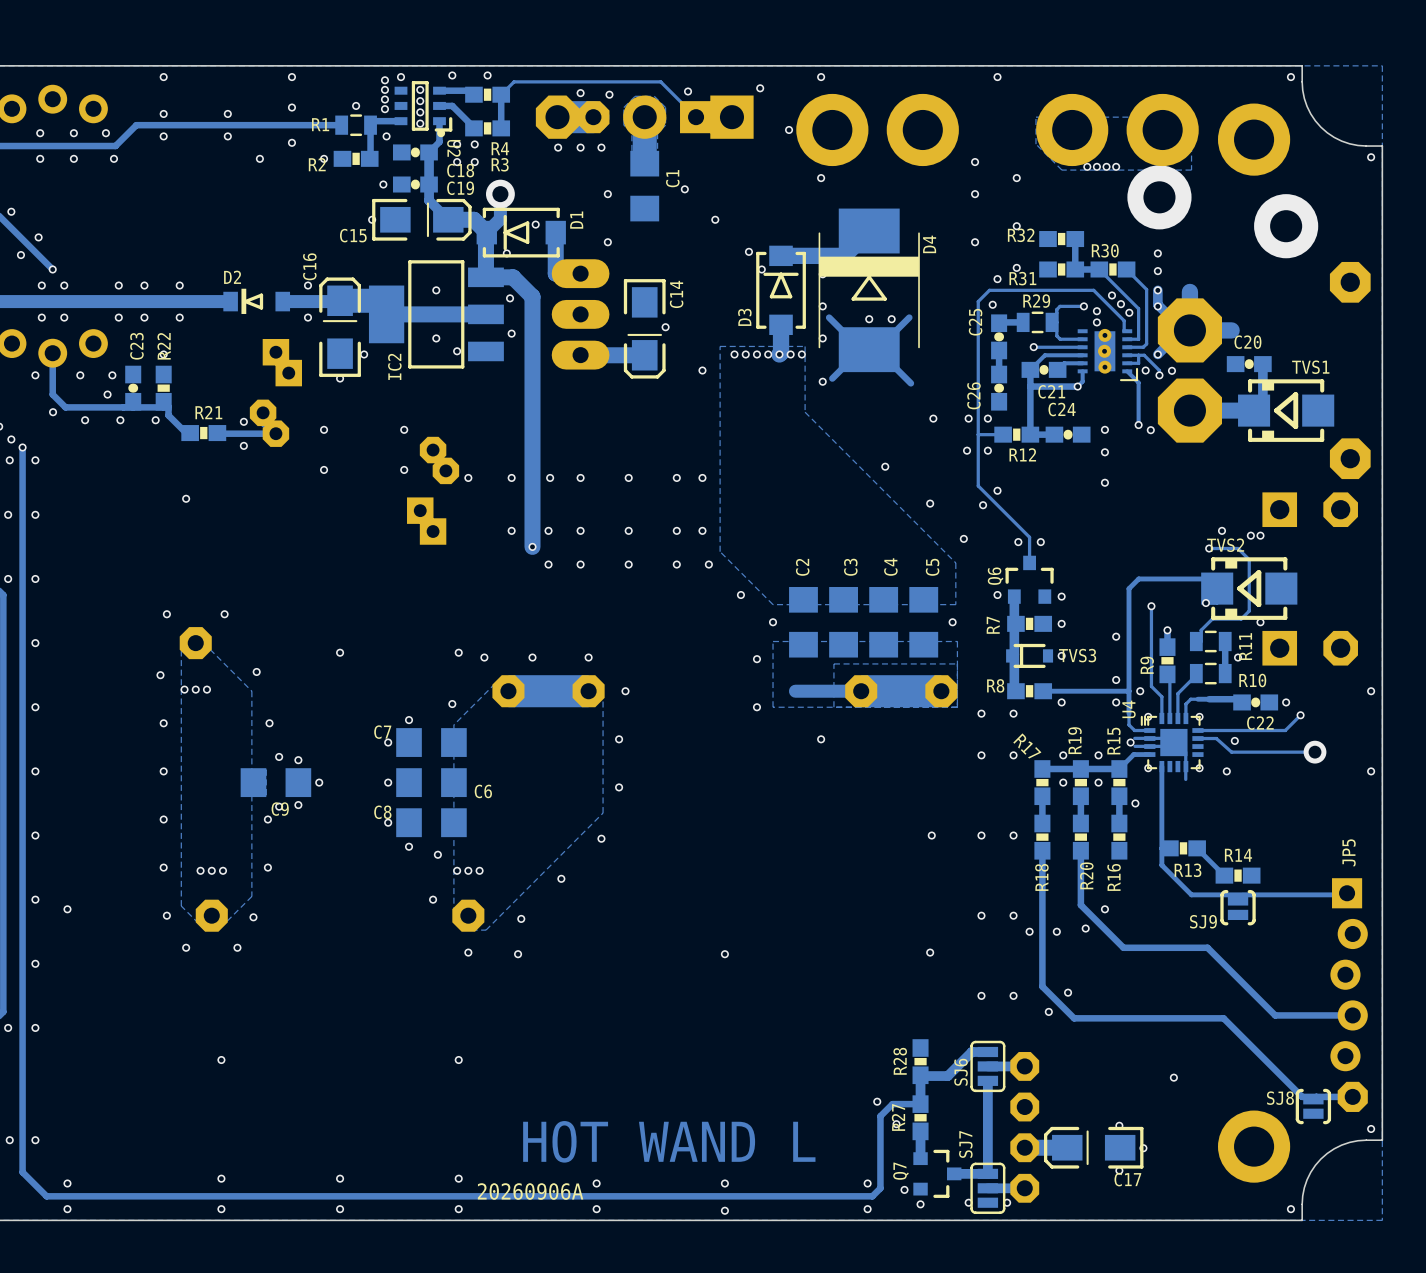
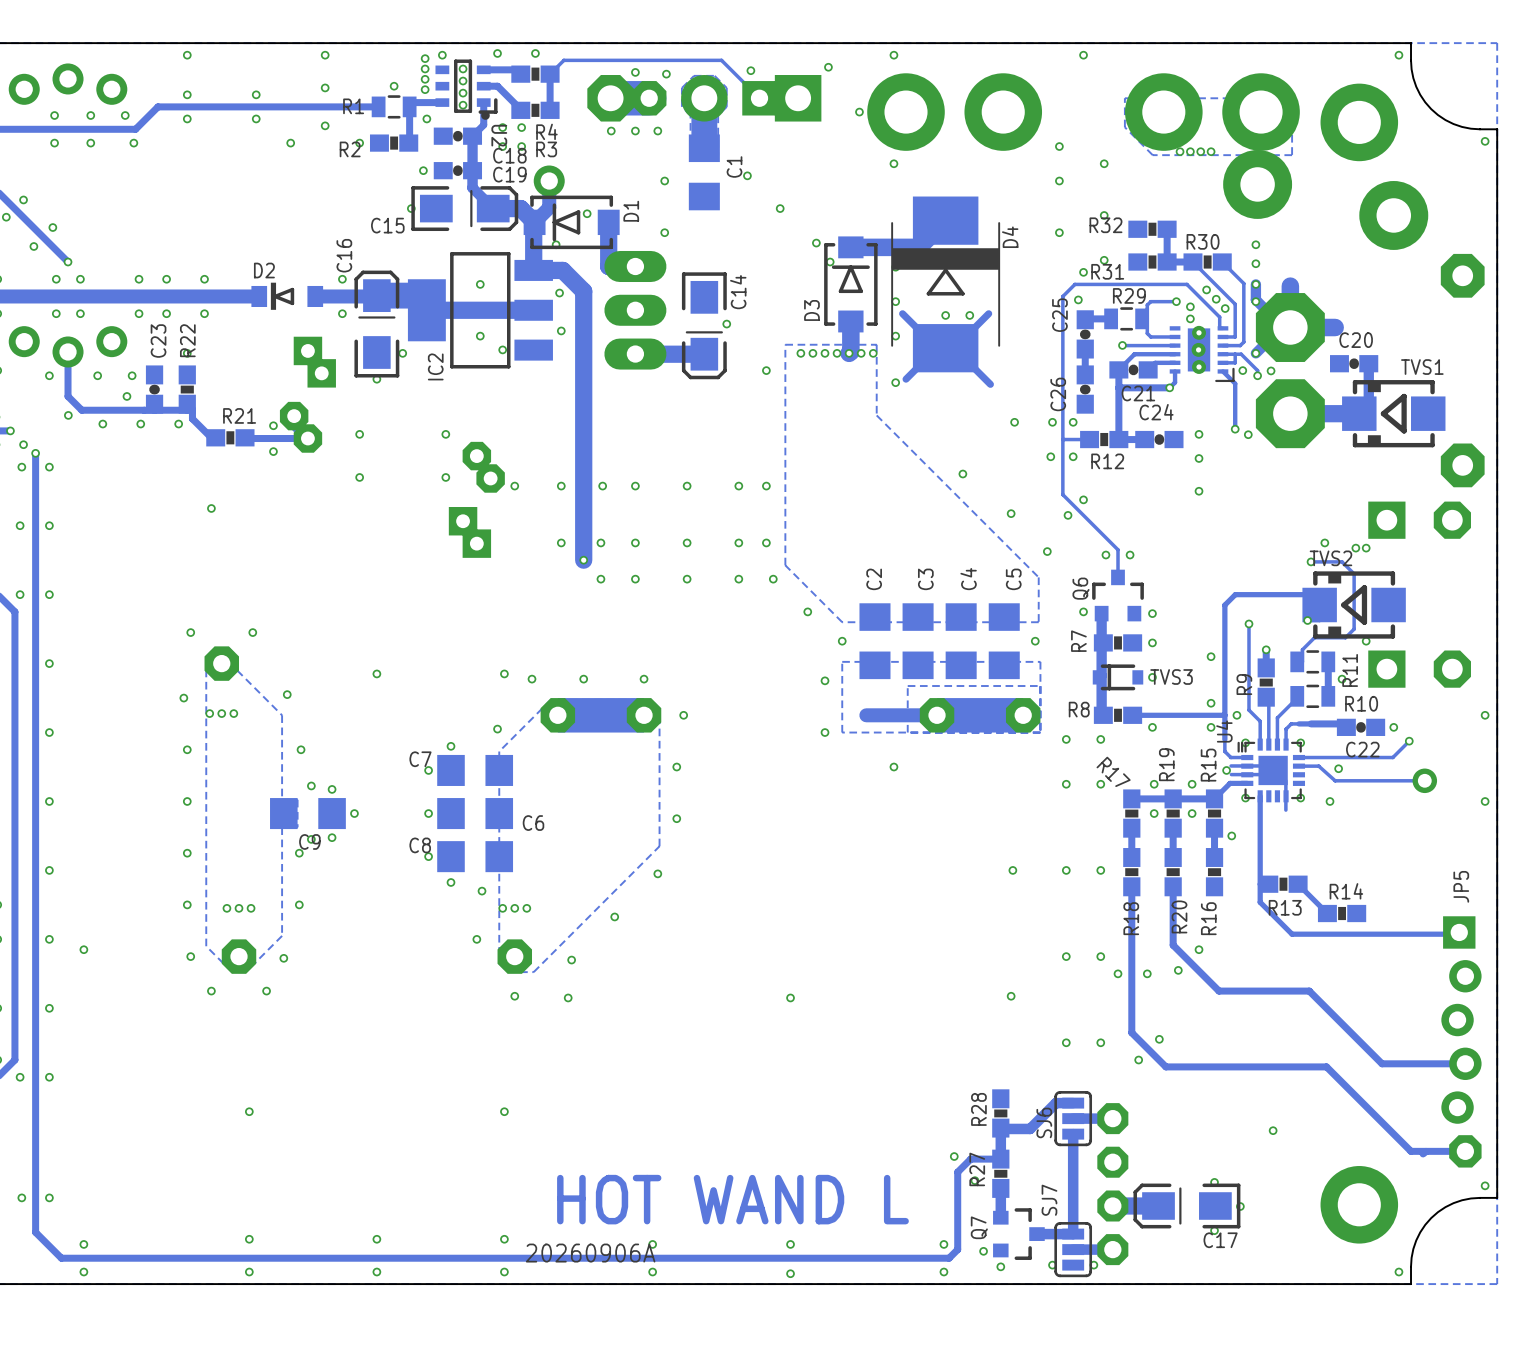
SJ9: (1238, 907) -> none
SJ8: (1313, 1106) -> none

